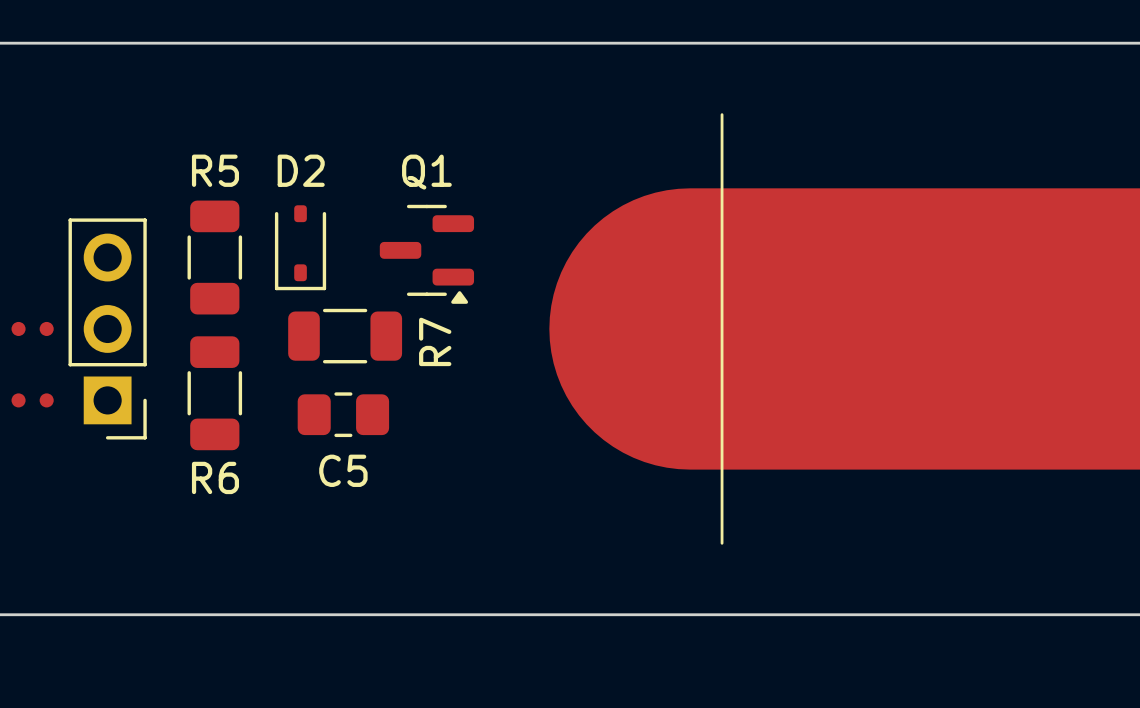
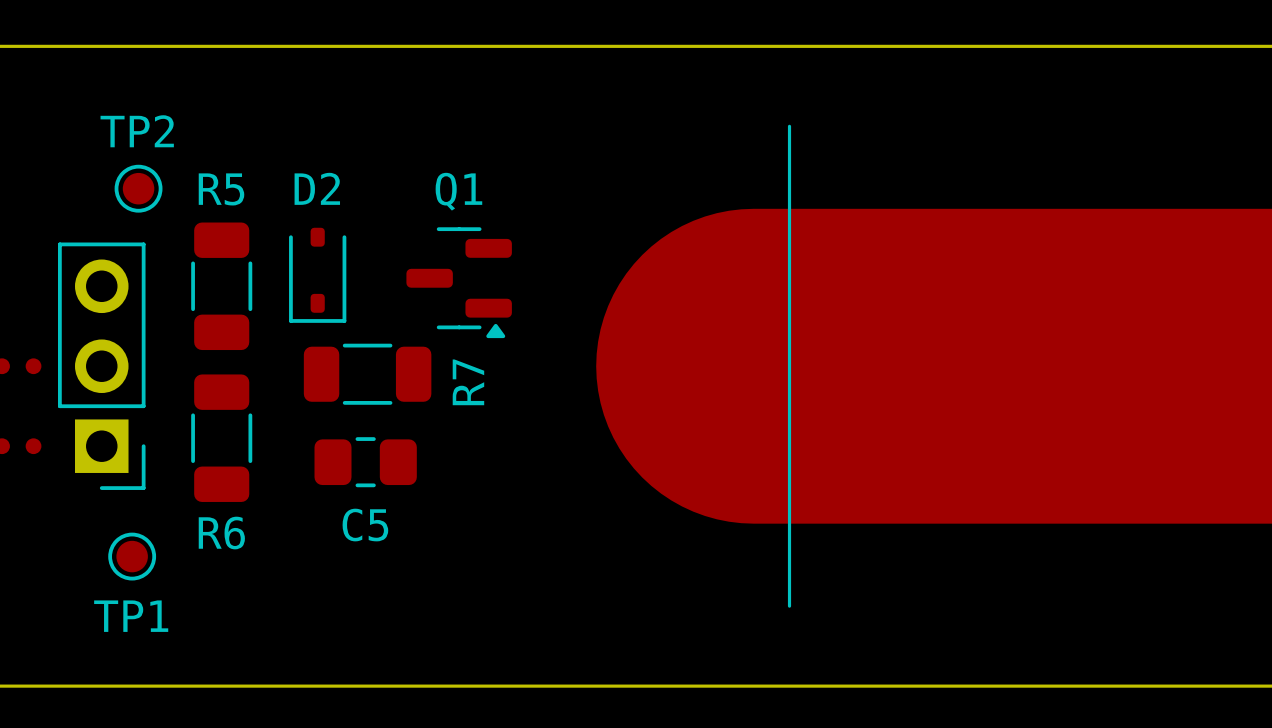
TP2: none -> (138, 188)
TP1: none -> (132, 556)

